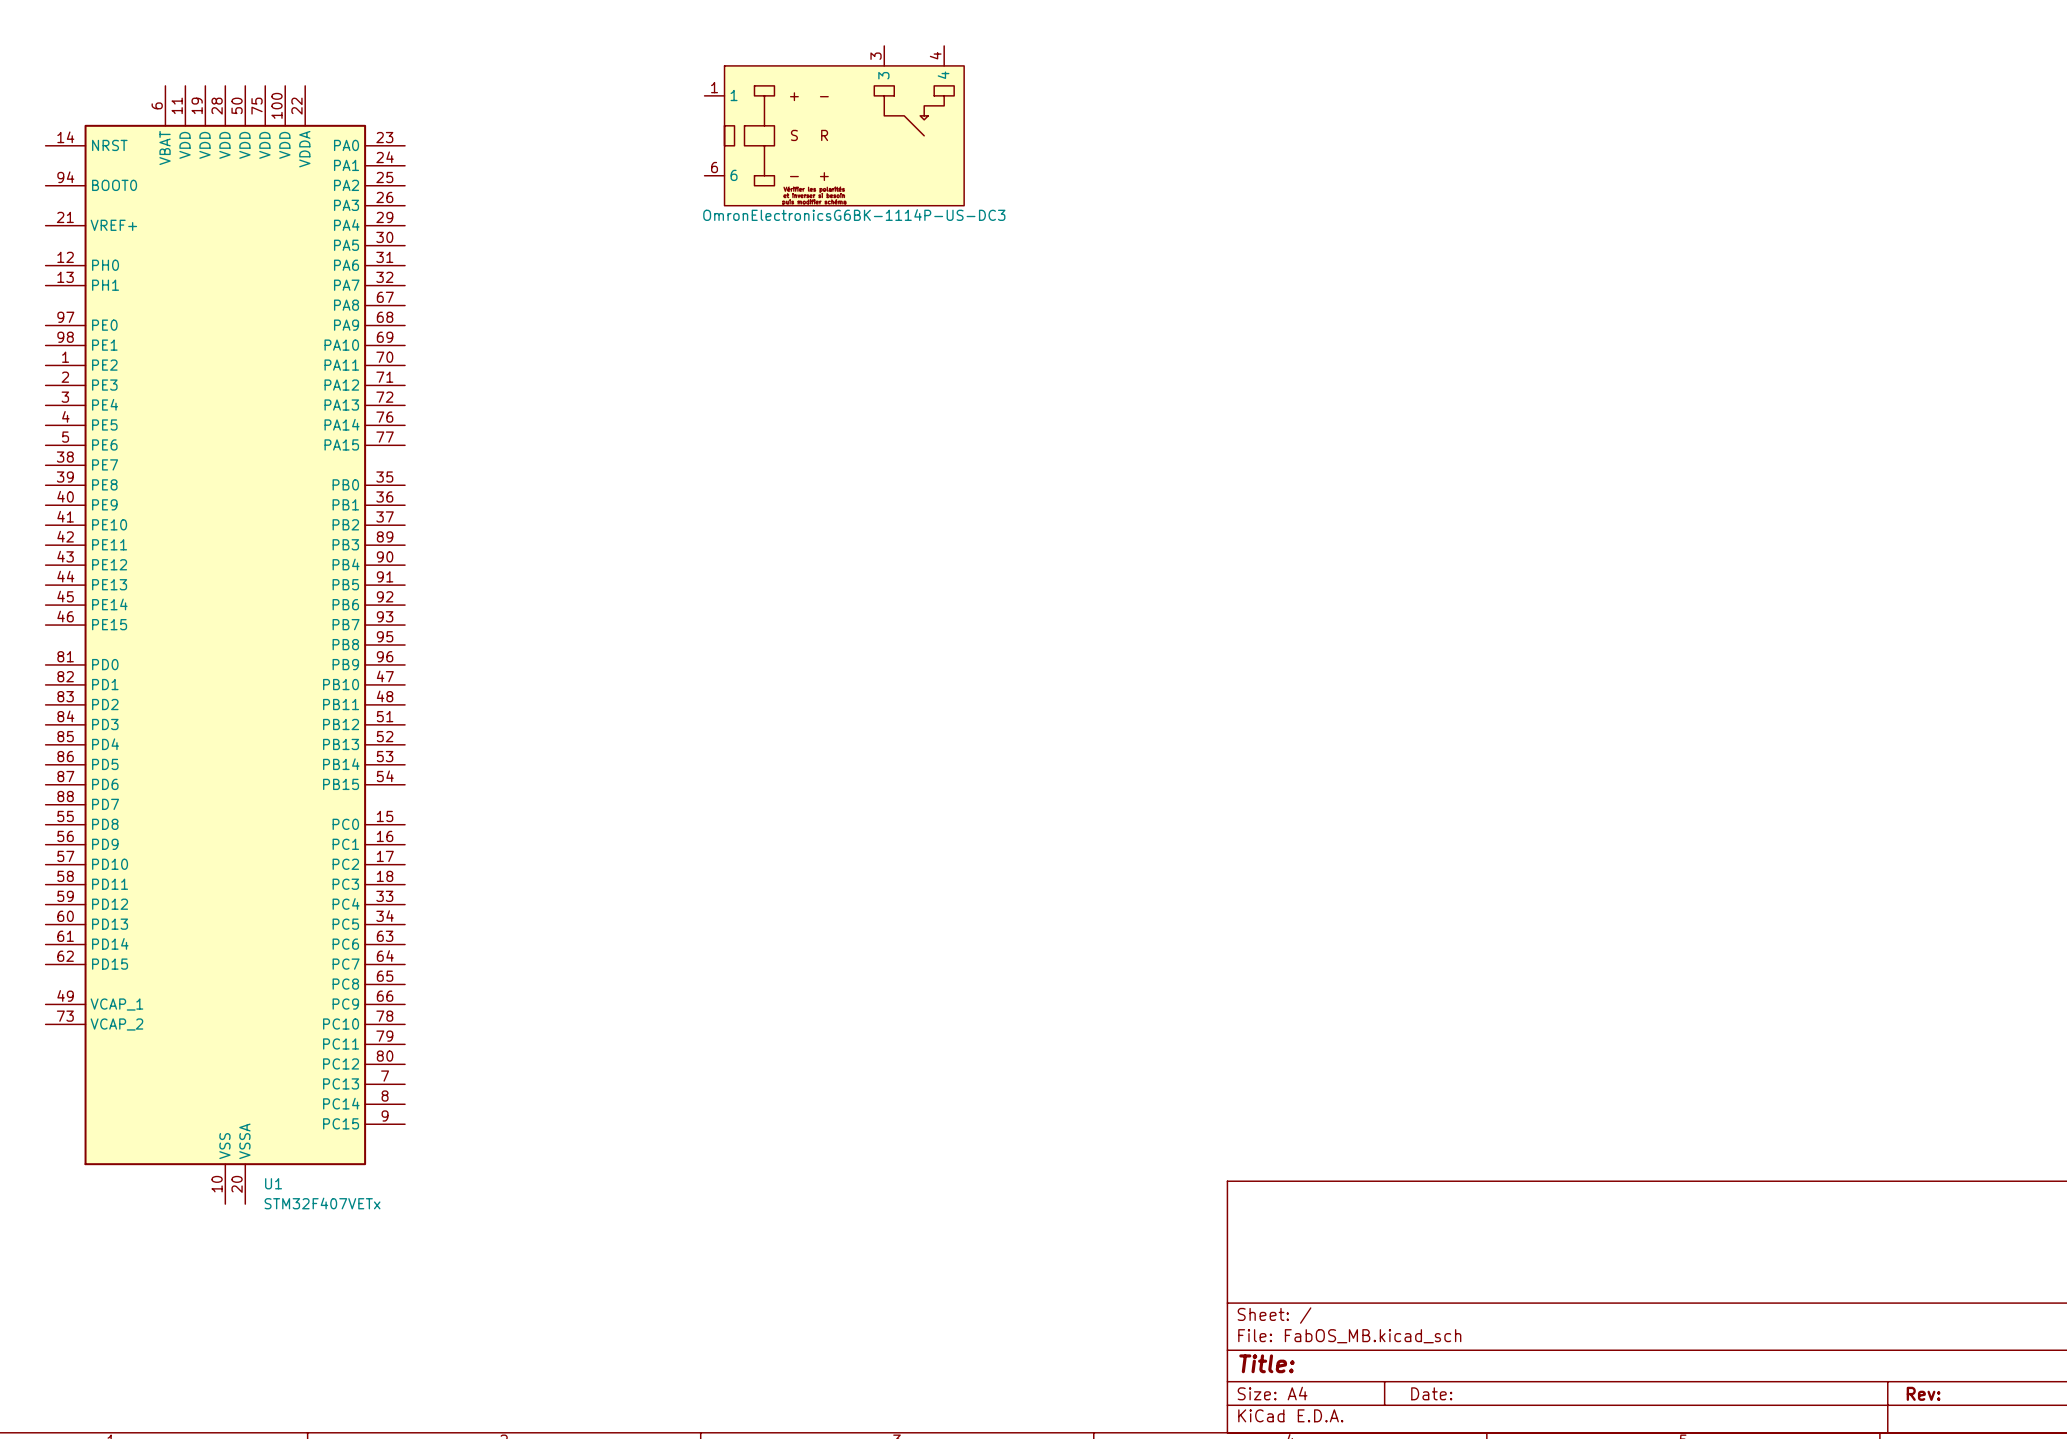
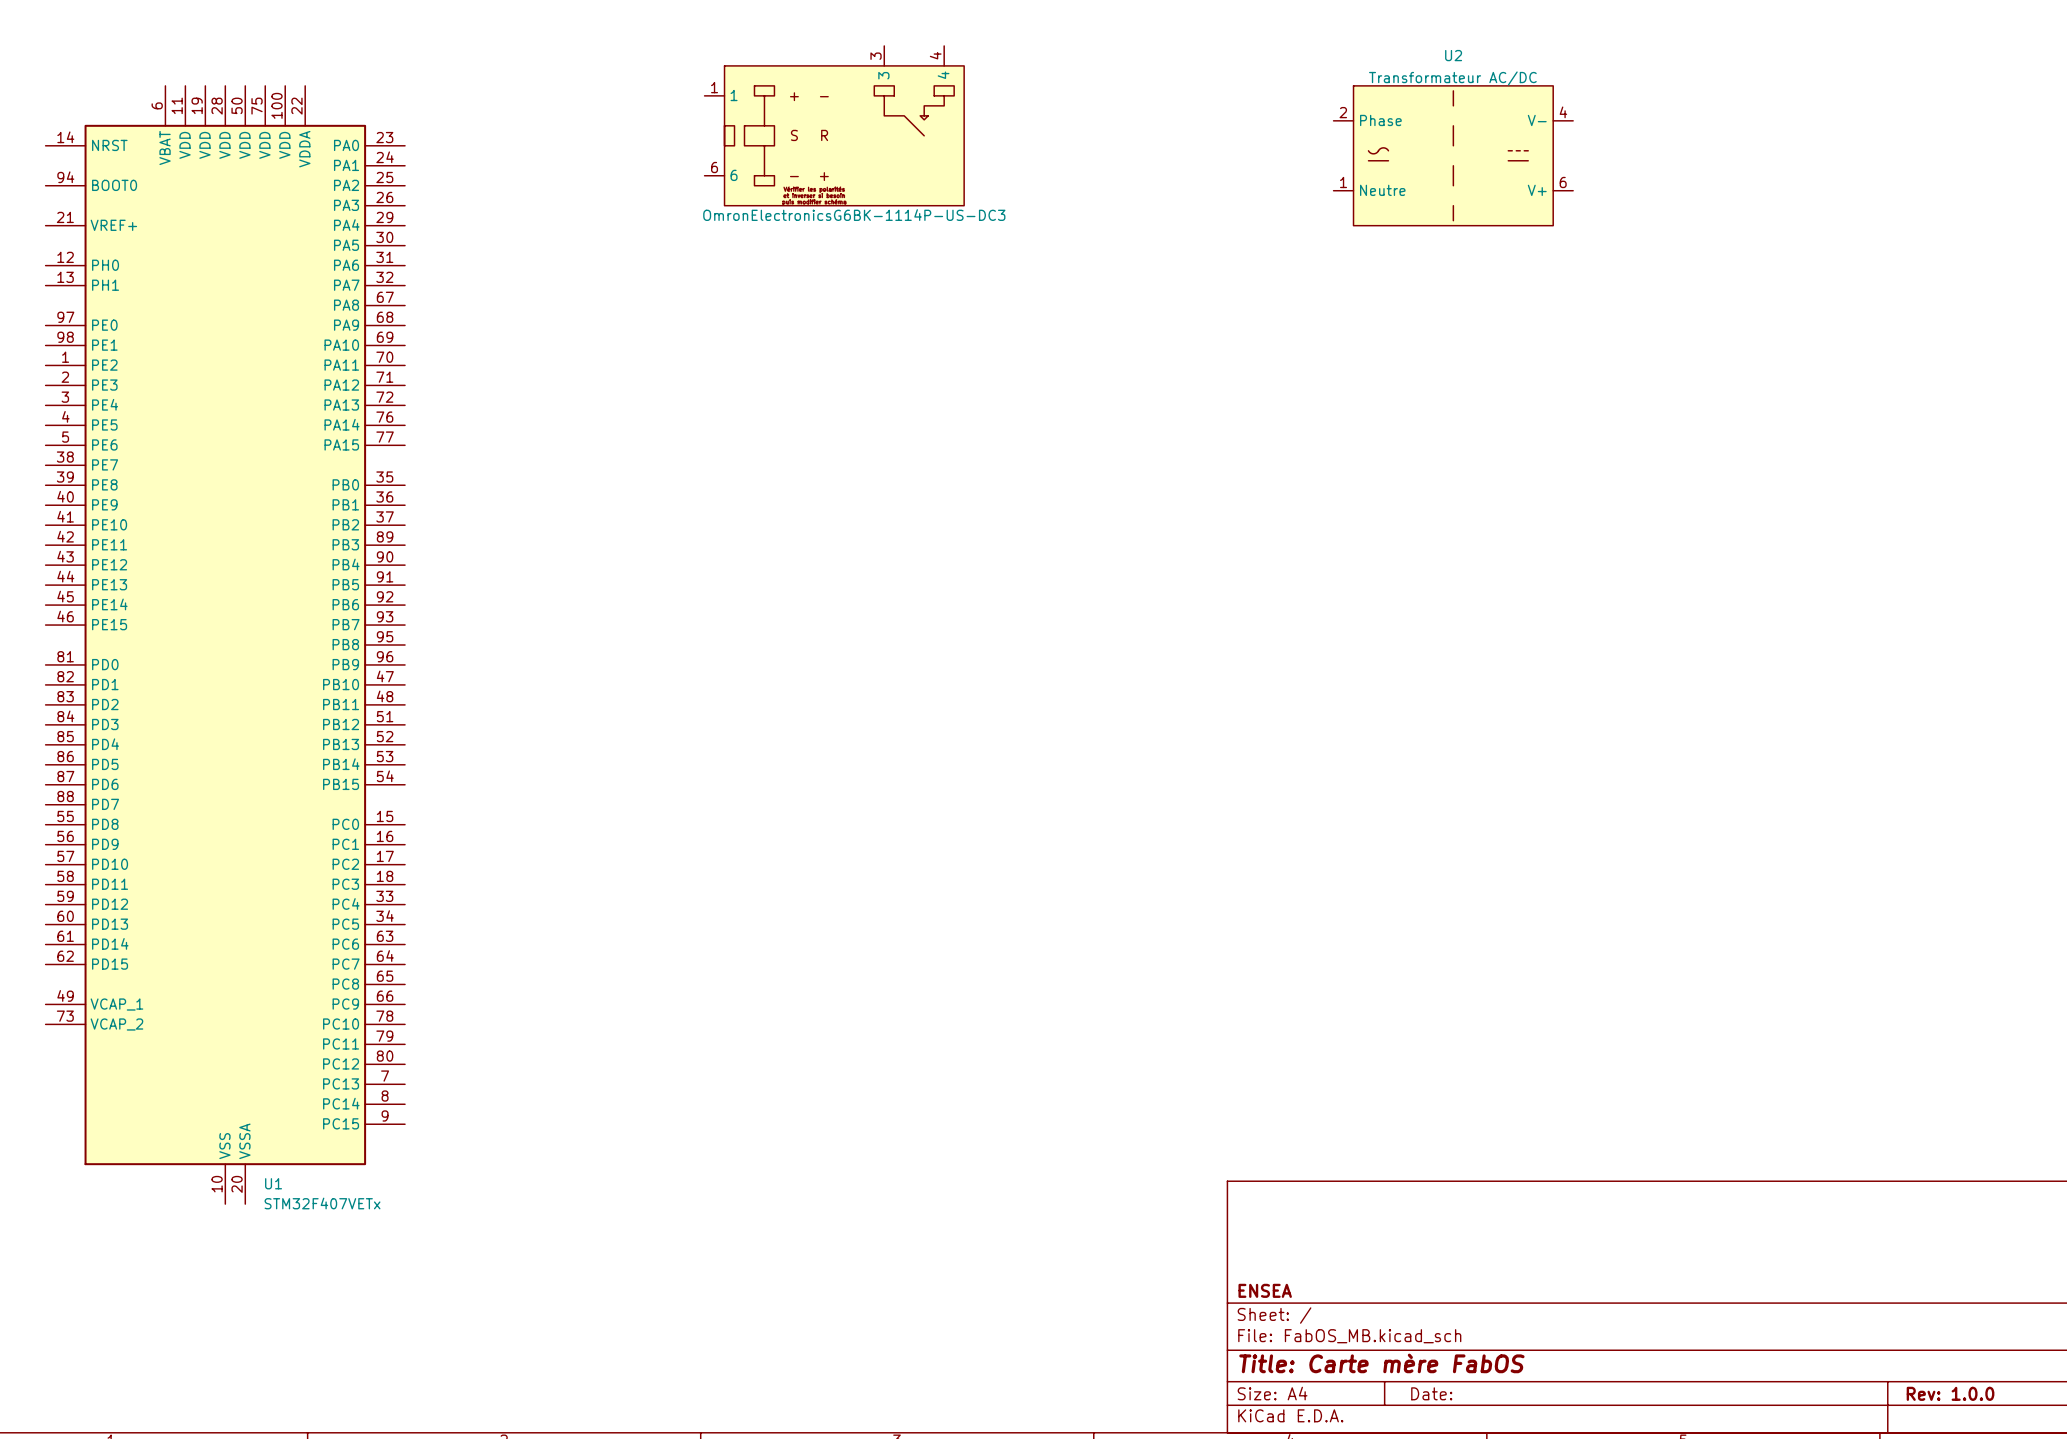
U2: none -> (1453, 155)
title block: none -> ENSEA (1265, 1290)
title block: Title: (1266, 1363) -> Title: Carte mère FabOS (1381, 1363)
title block: Rev: (1923, 1393) -> Rev: 1.0.0 (1950, 1393)

